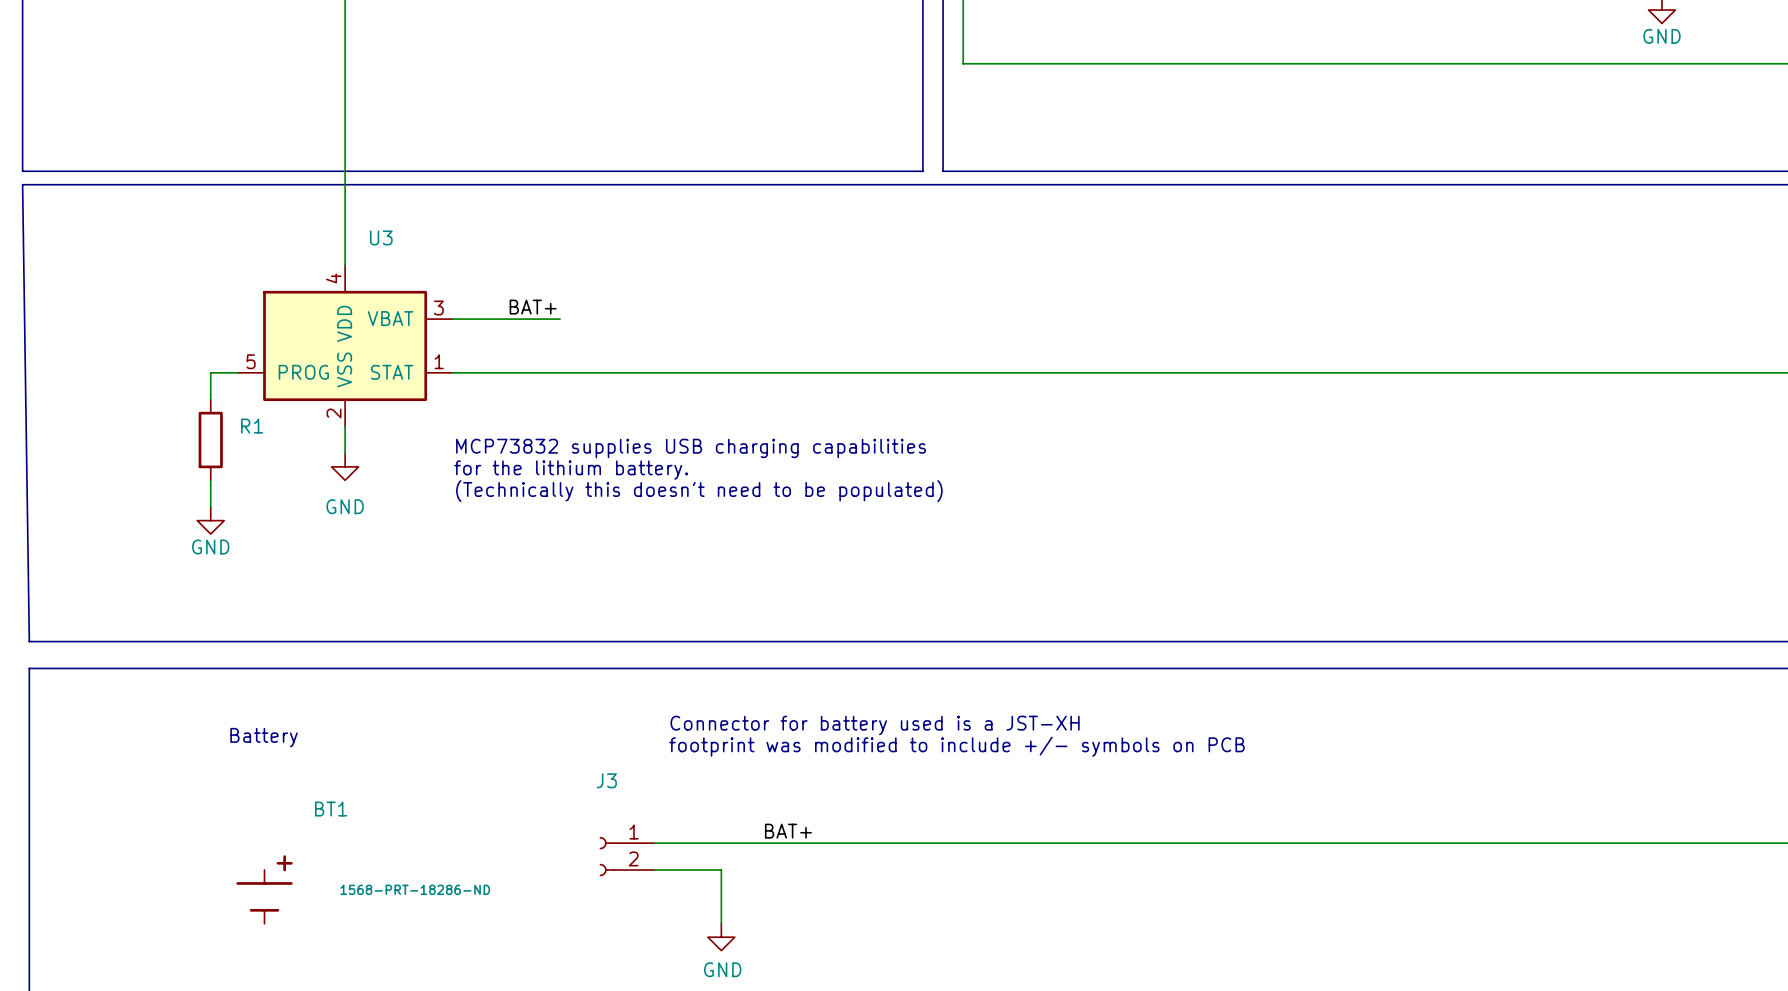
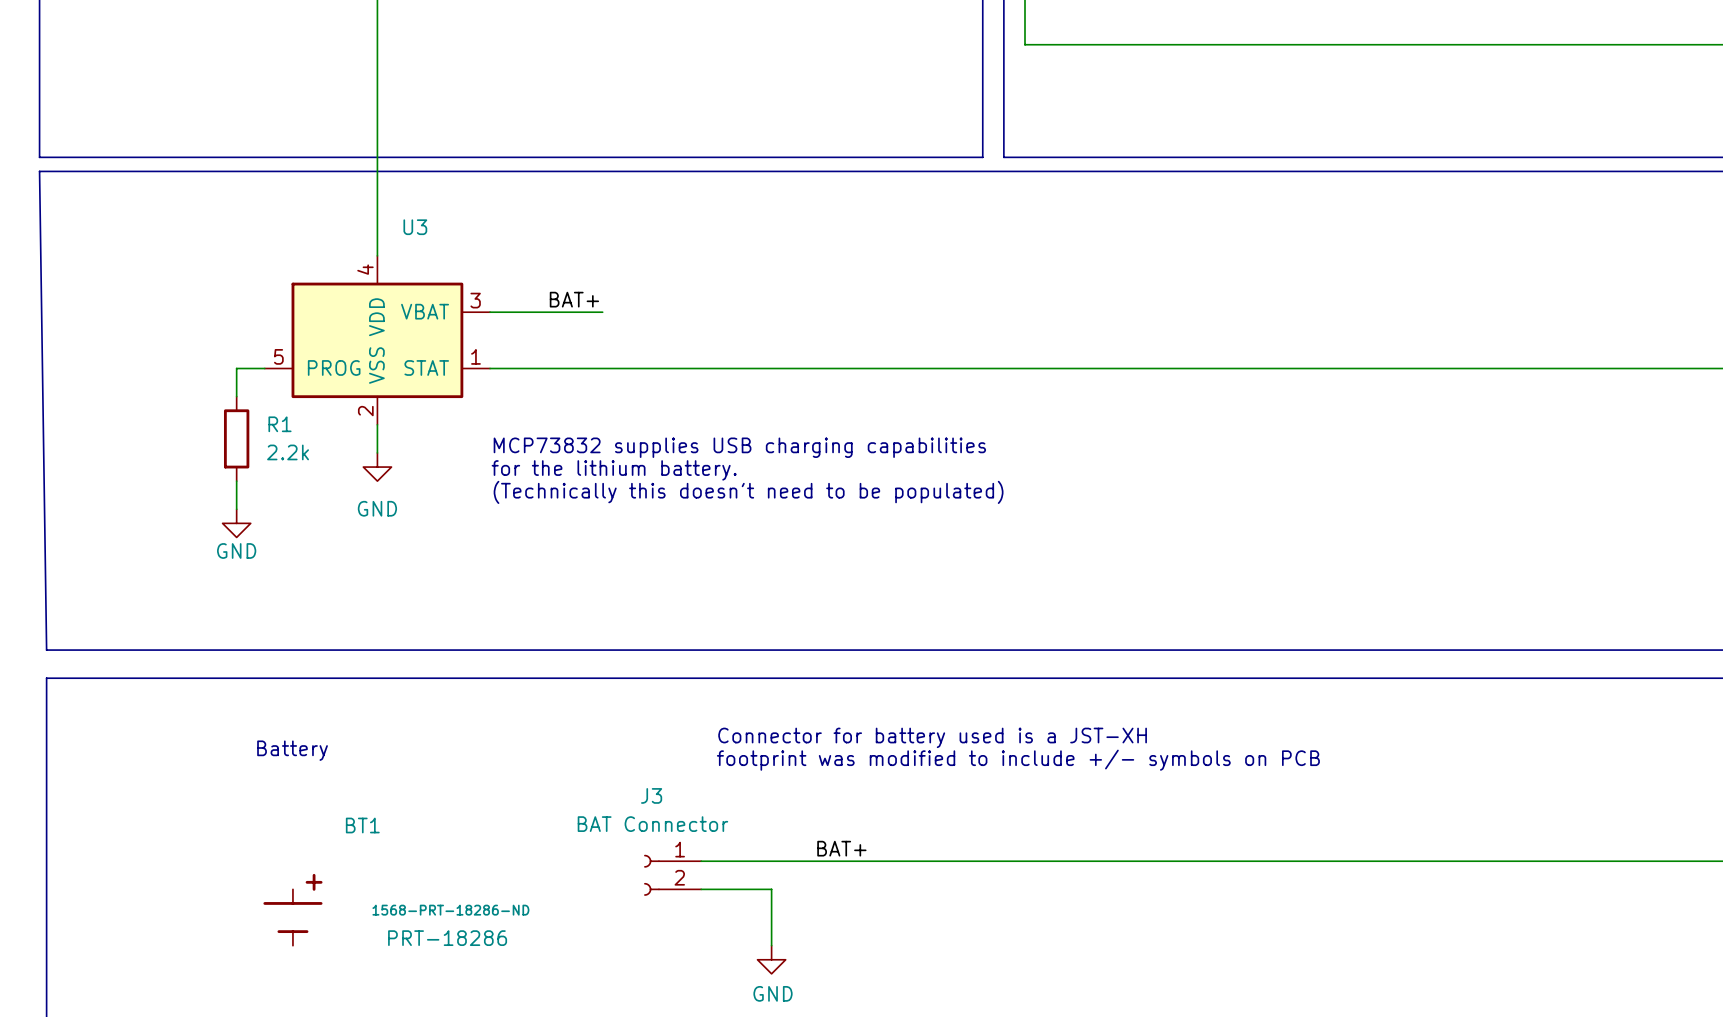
R1 value: none -> 2.2k (288, 452)
J3 value: none -> BAT Connector (652, 824)
BT1 value: none -> PRT-18286 (447, 938)

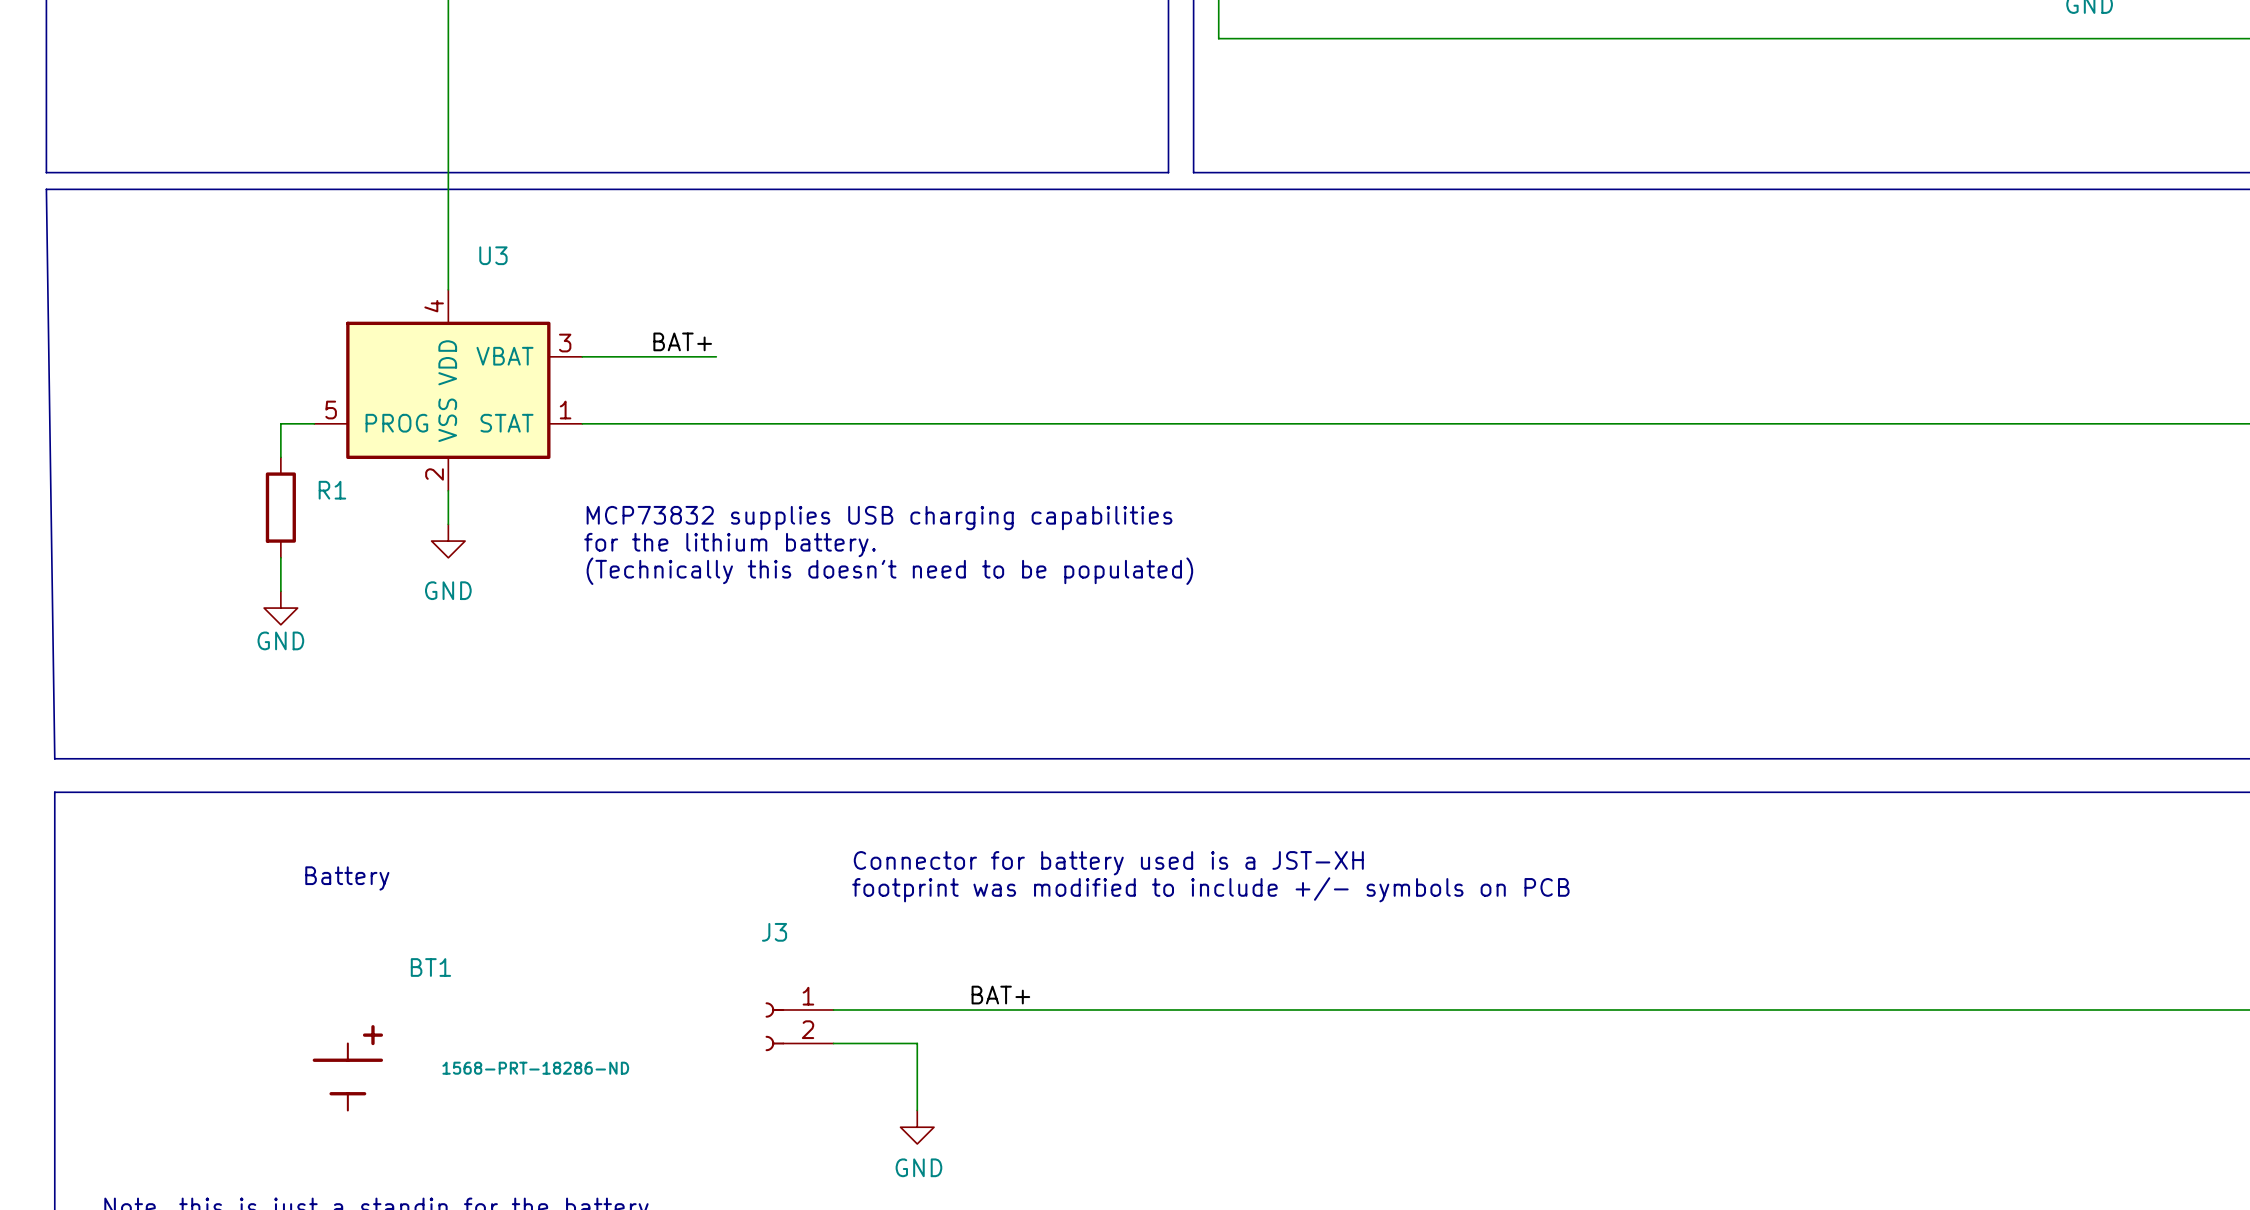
R1 value: 2.2k (288, 452) -> none
J3 value: BAT Connector (652, 824) -> none
BT1 value: PRT-18286 (447, 938) -> none

